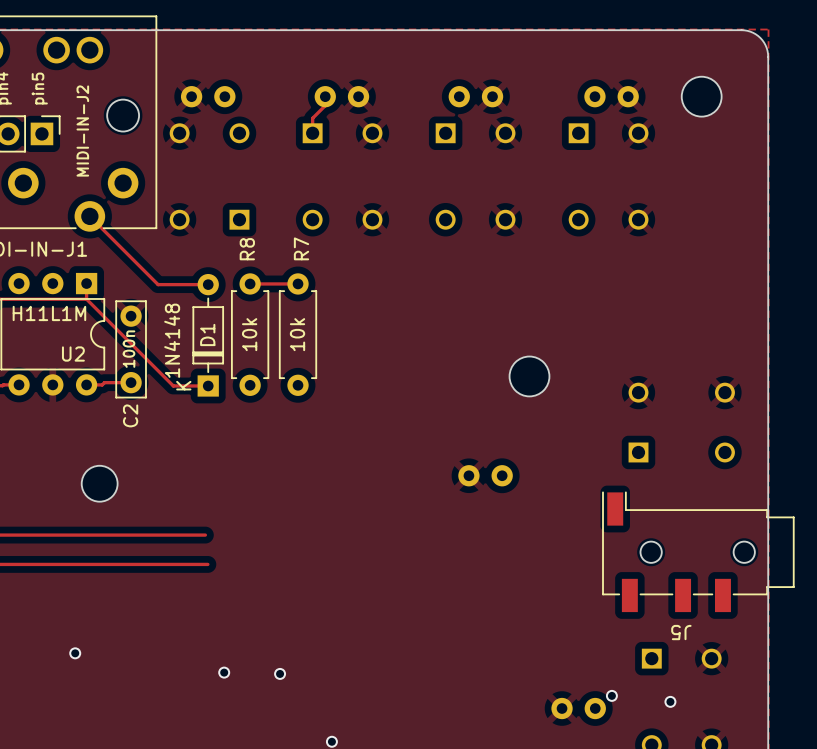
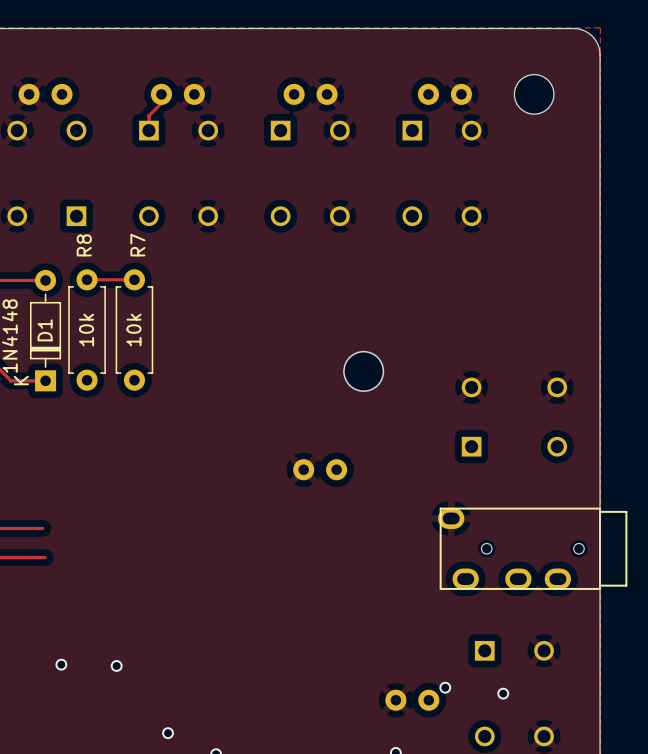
J5: (698, 551) -> none
part: none -> (532, 548)

